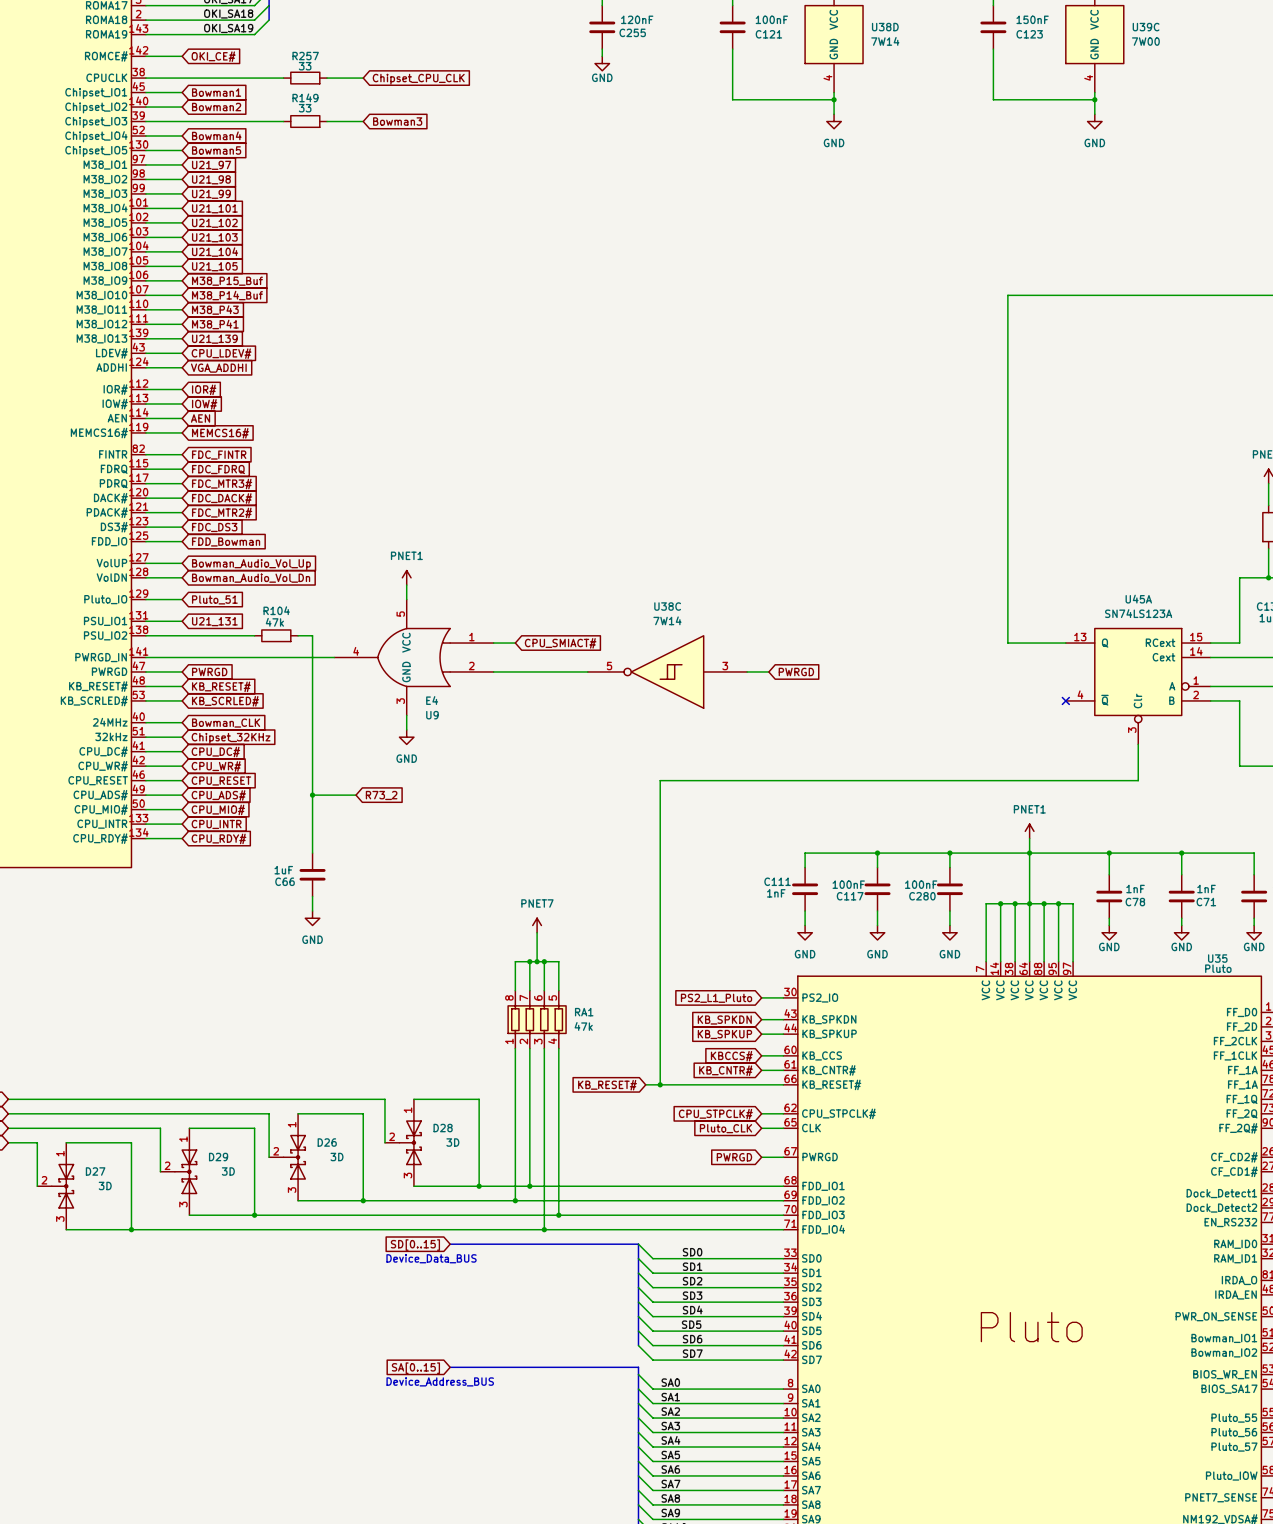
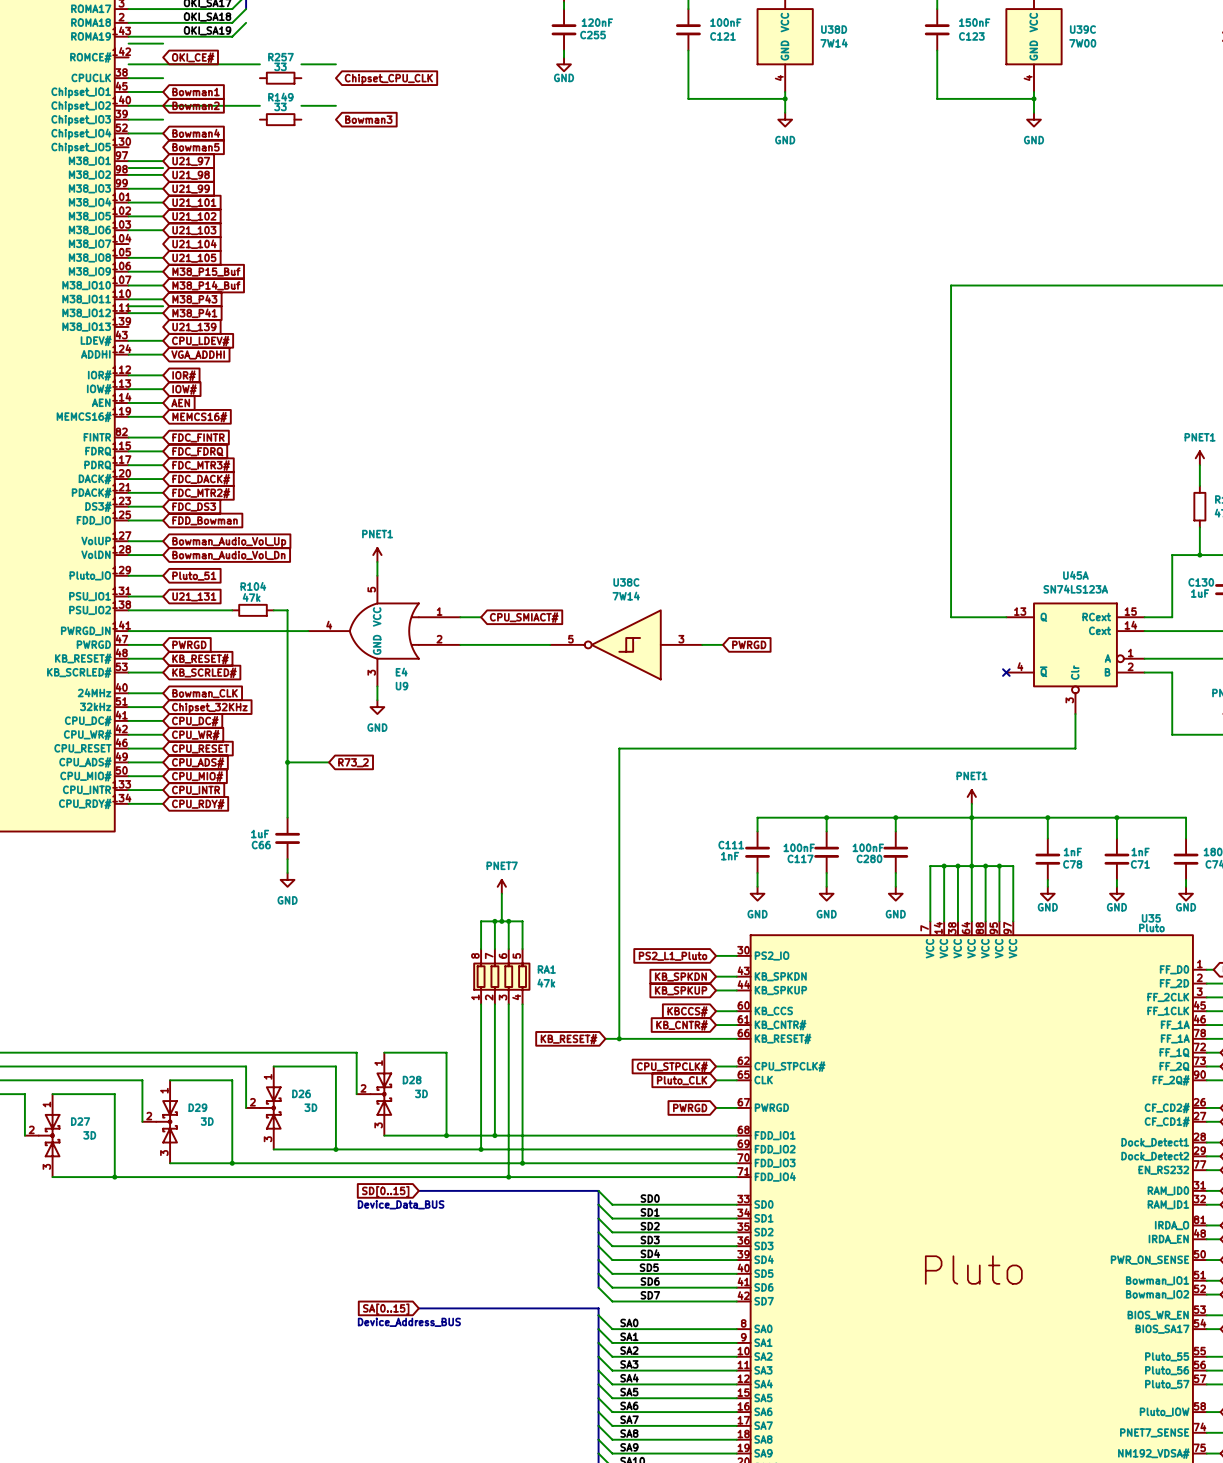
bus: (269, 5) (269, 20) -> none
wire: (145, 56) (182, 56) -> (128, 43) (163, 43)
wire: none -> (128, 64) (259, 64)
wire: (182, 78) (283, 78) -> none
wire: (327, 78) (363, 78) -> (301, 64) (335, 64)
wire: (182, 121) (283, 121) -> (163, 105) (259, 105)
wire: (327, 121) (363, 121) -> (301, 105) (335, 105)
wire: (145, 150) (182, 150) -> (128, 168) (163, 168)
wire: (145, 251) (182, 251) -> none
wire: (145, 338) (182, 338) -> (128, 306) (163, 306)

